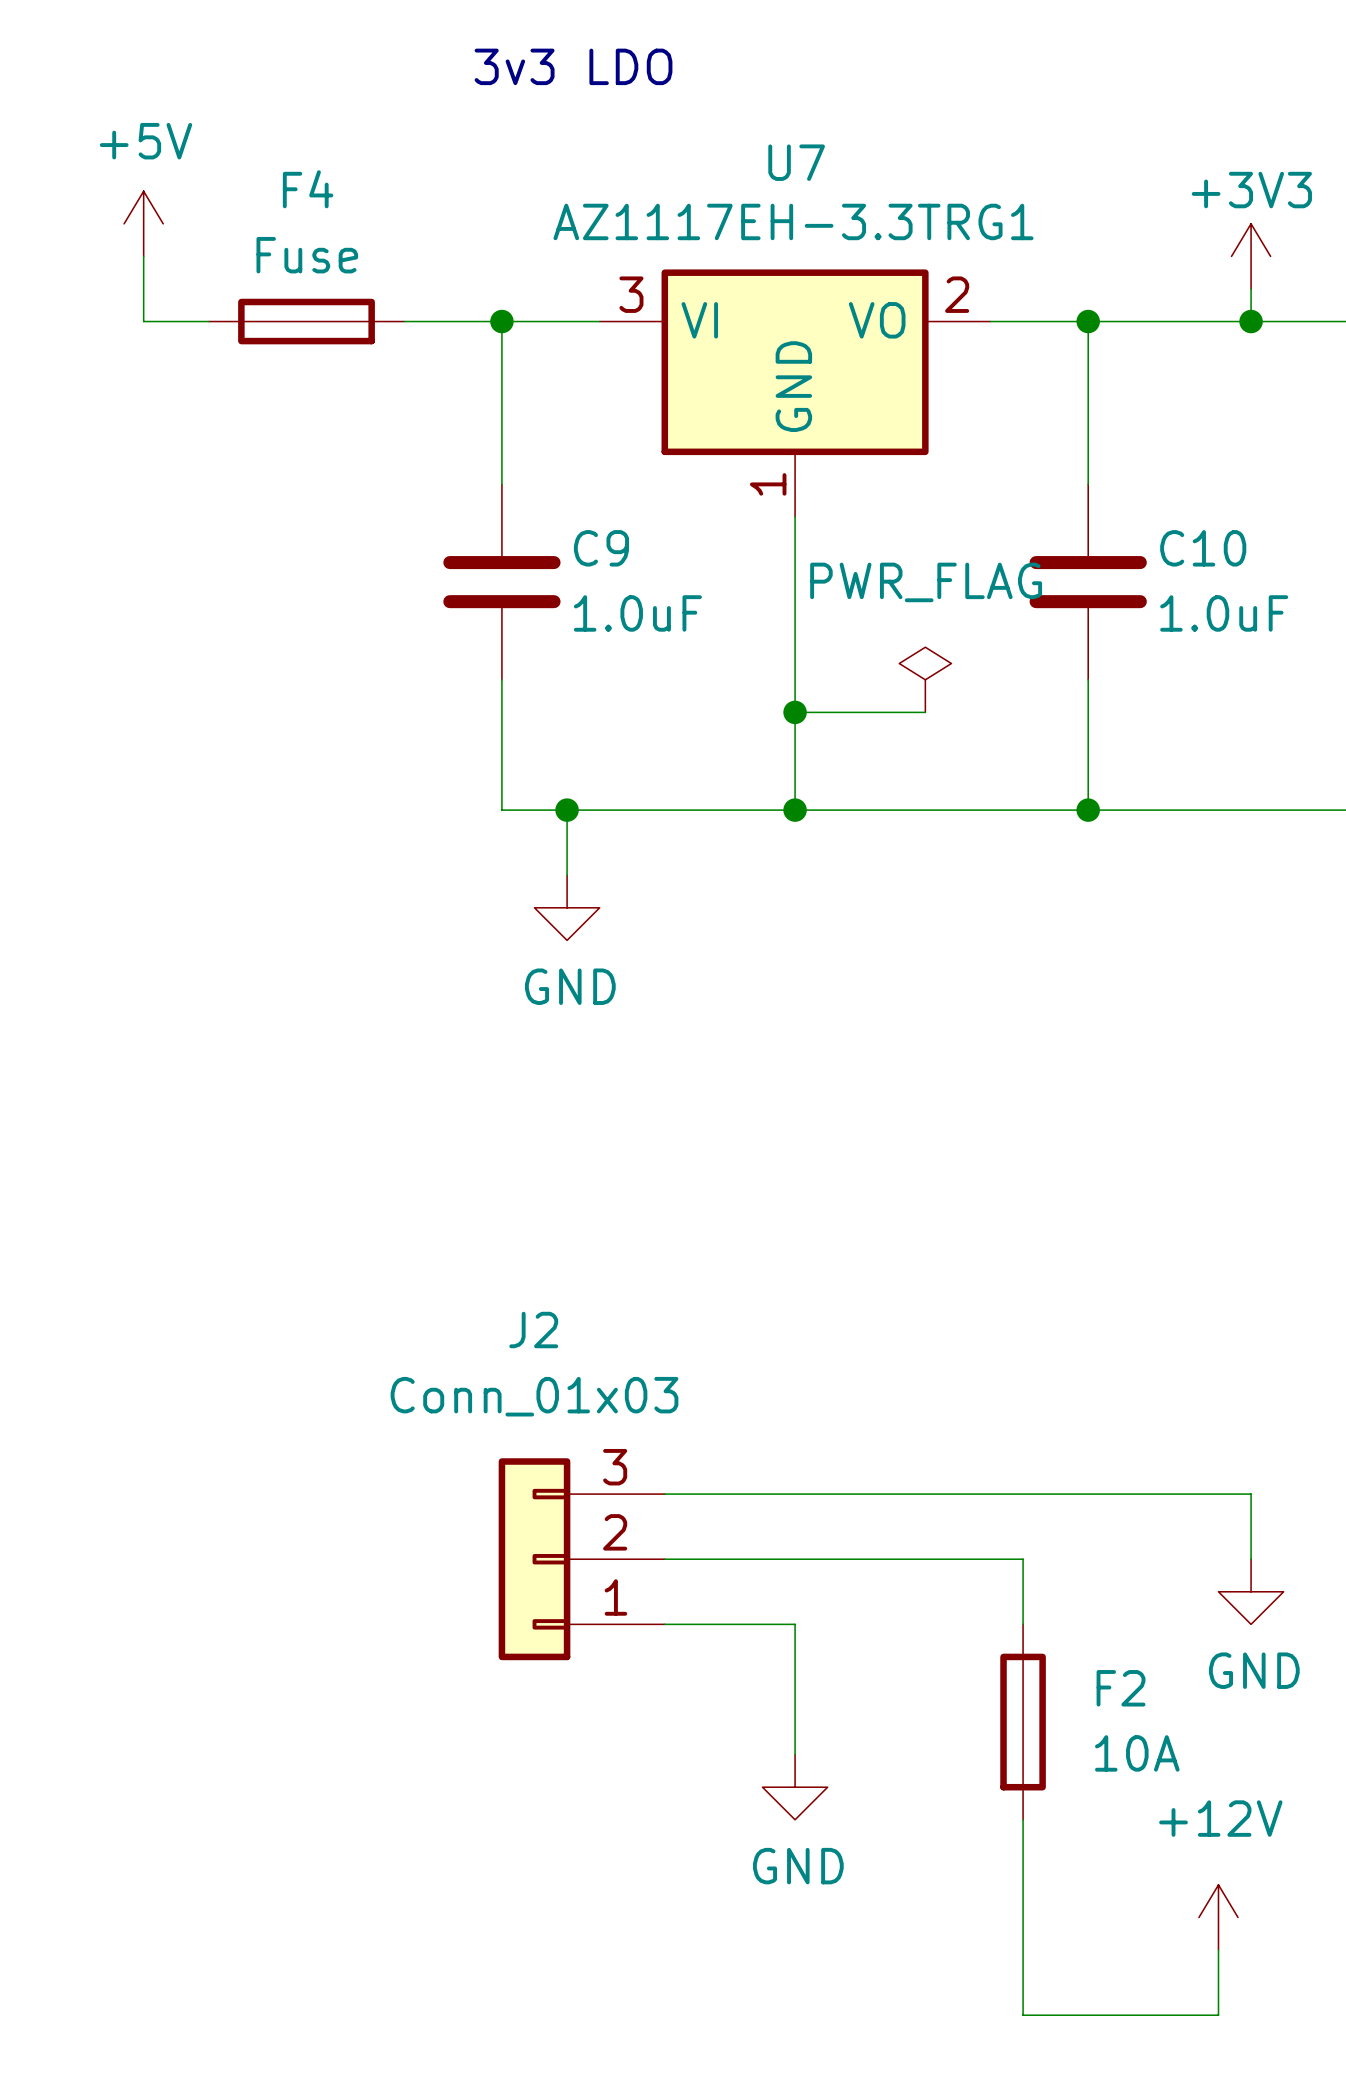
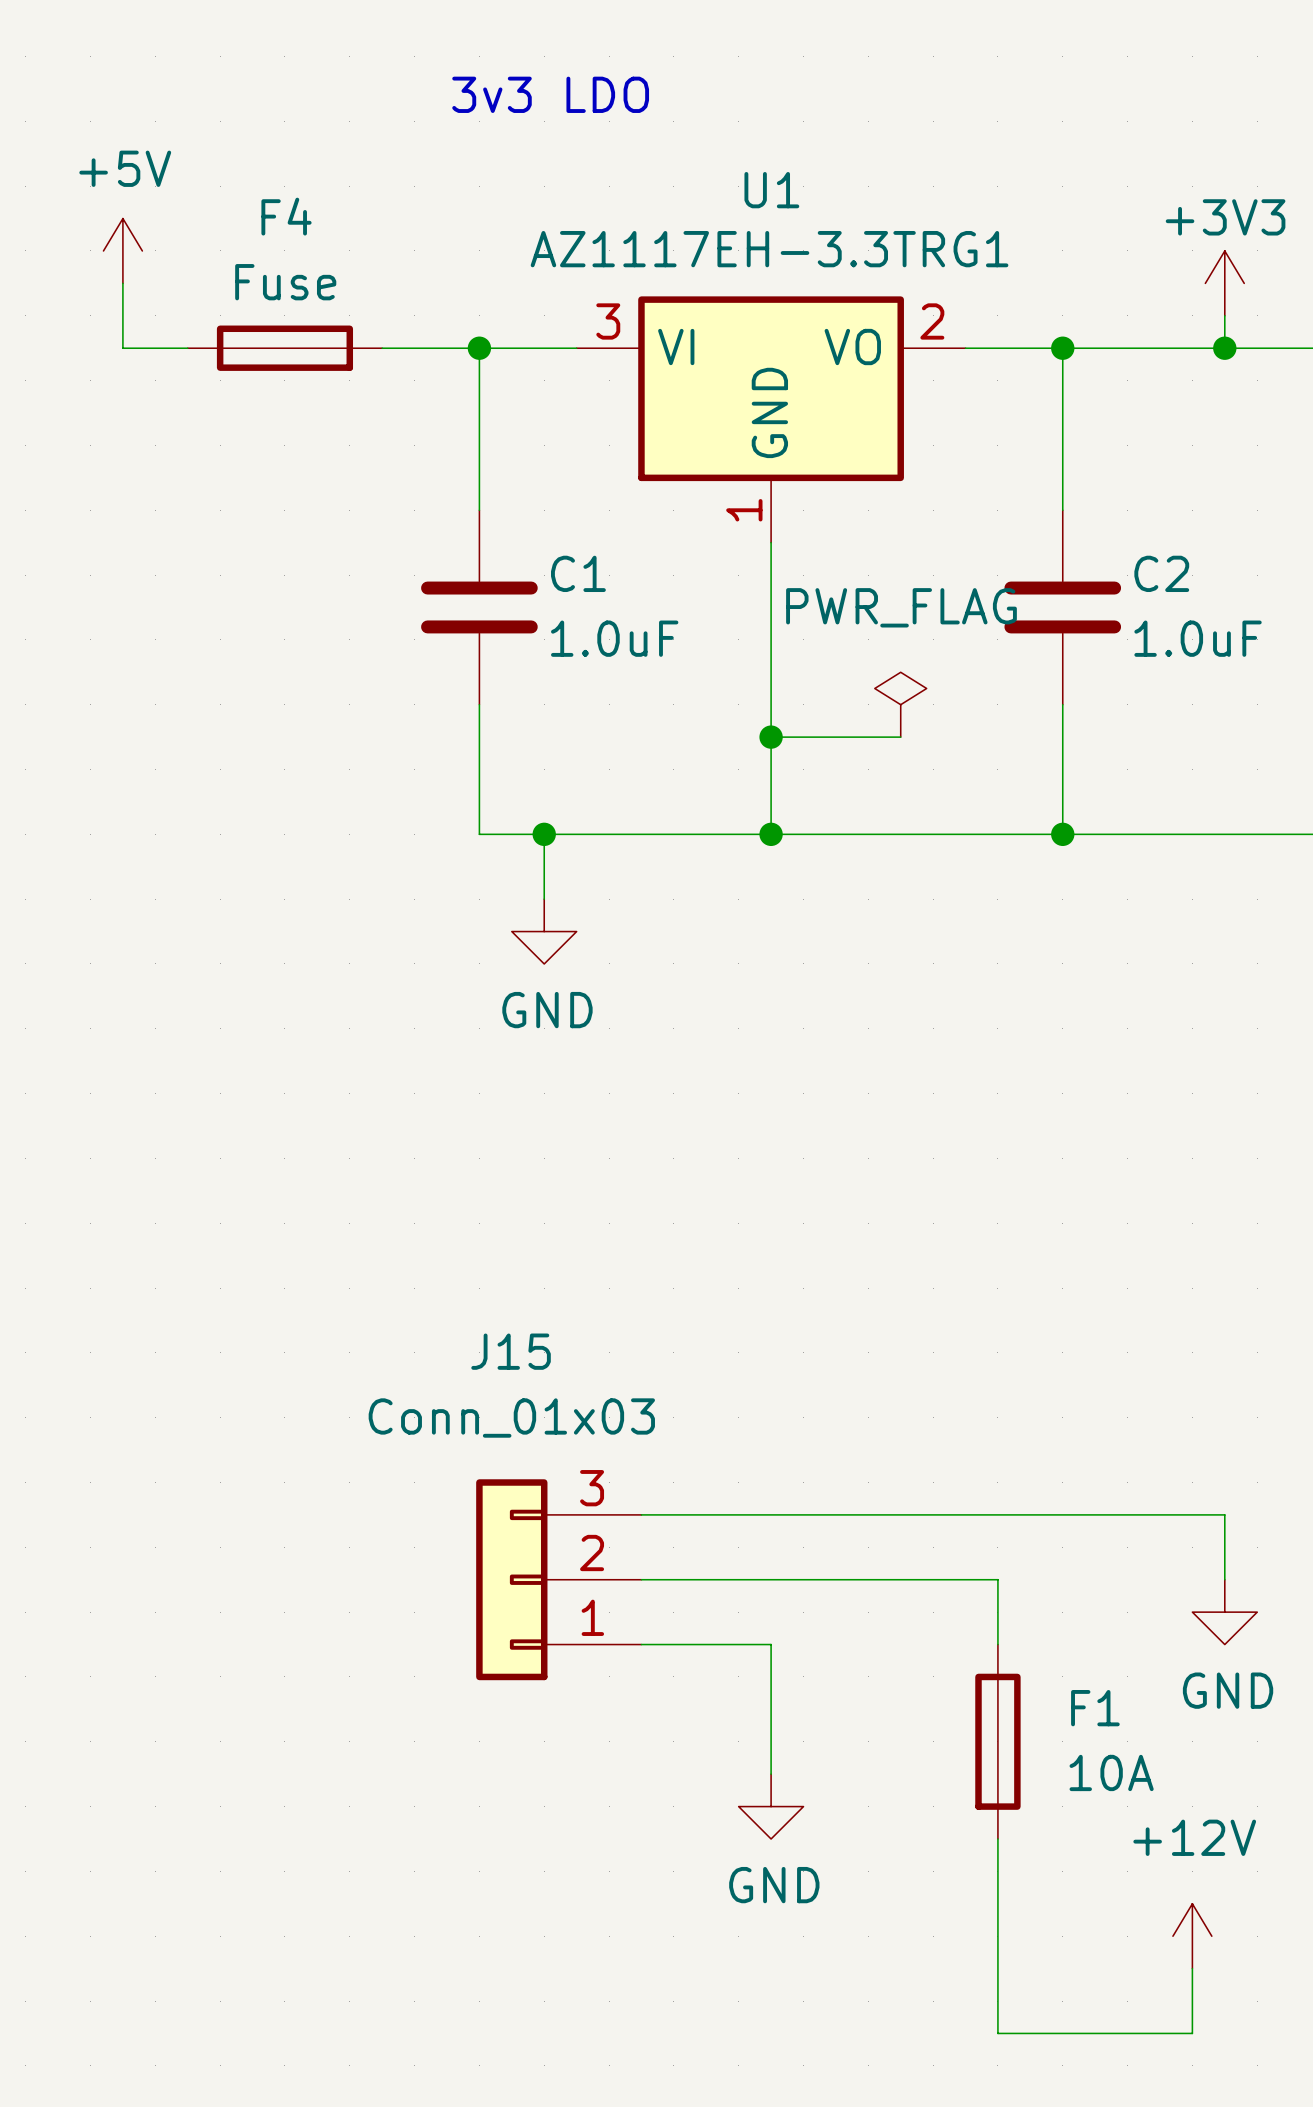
U7 name: U7 (796, 162) -> U1 (771, 190)
C9 name: C9 (601, 548) -> C1 (578, 573)
C10 name: C10 (1203, 548) -> C2 (1161, 573)
J2 name: J2 (533, 1330) -> J15 (511, 1351)
F2 name: F2 (1121, 1688) -> F1 (1095, 1708)

